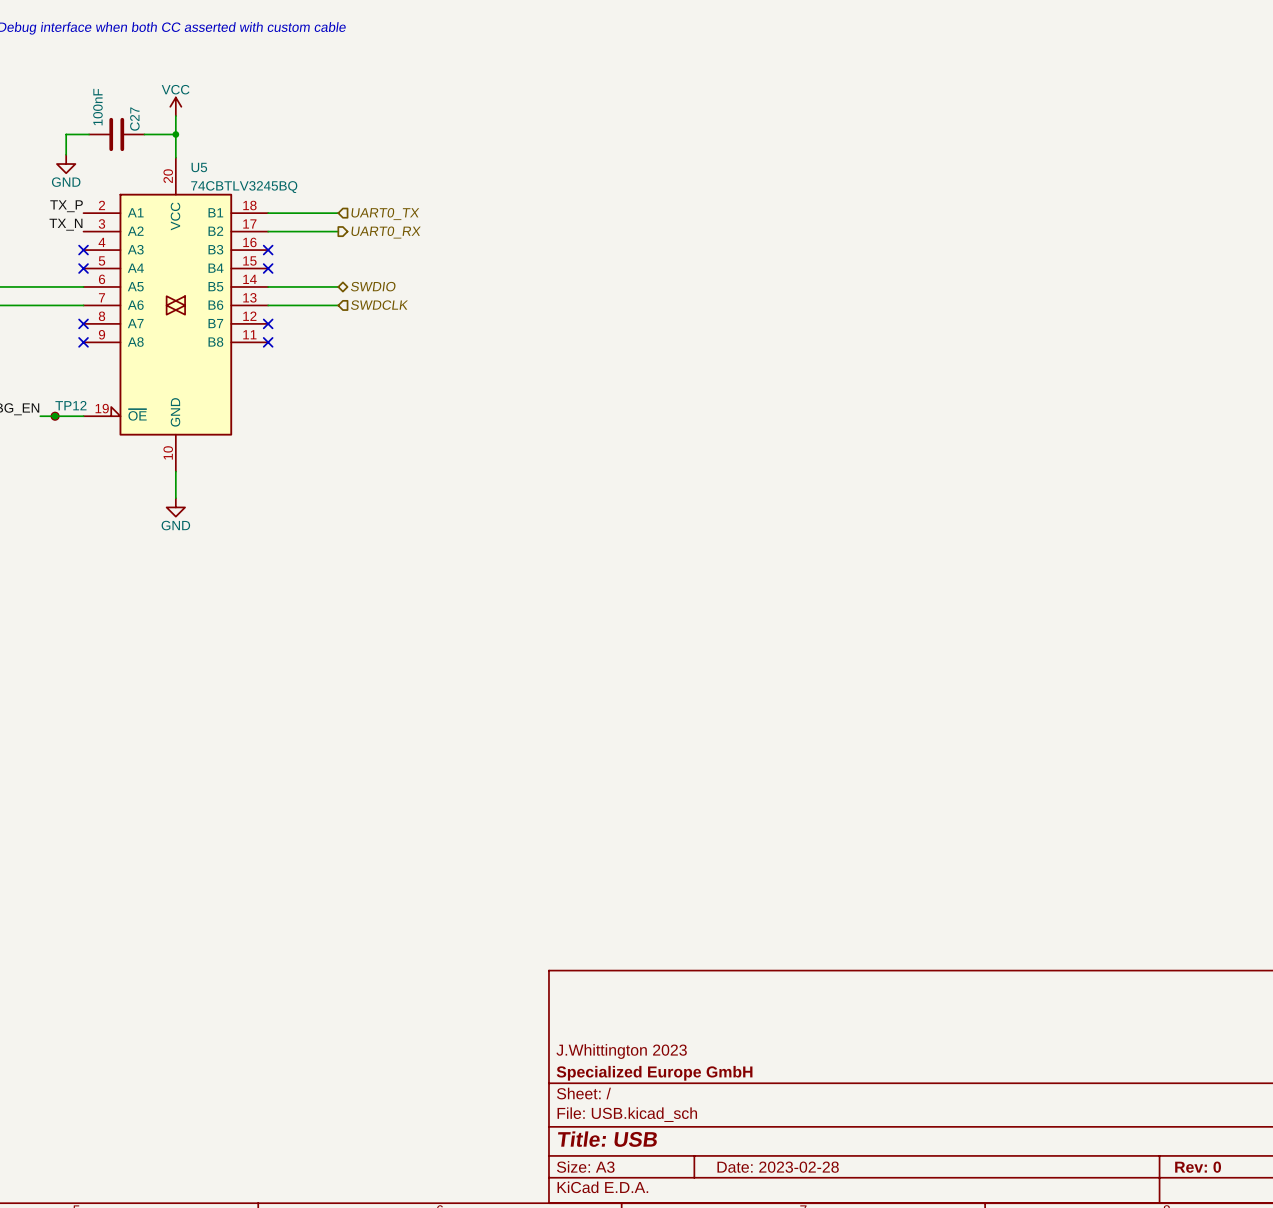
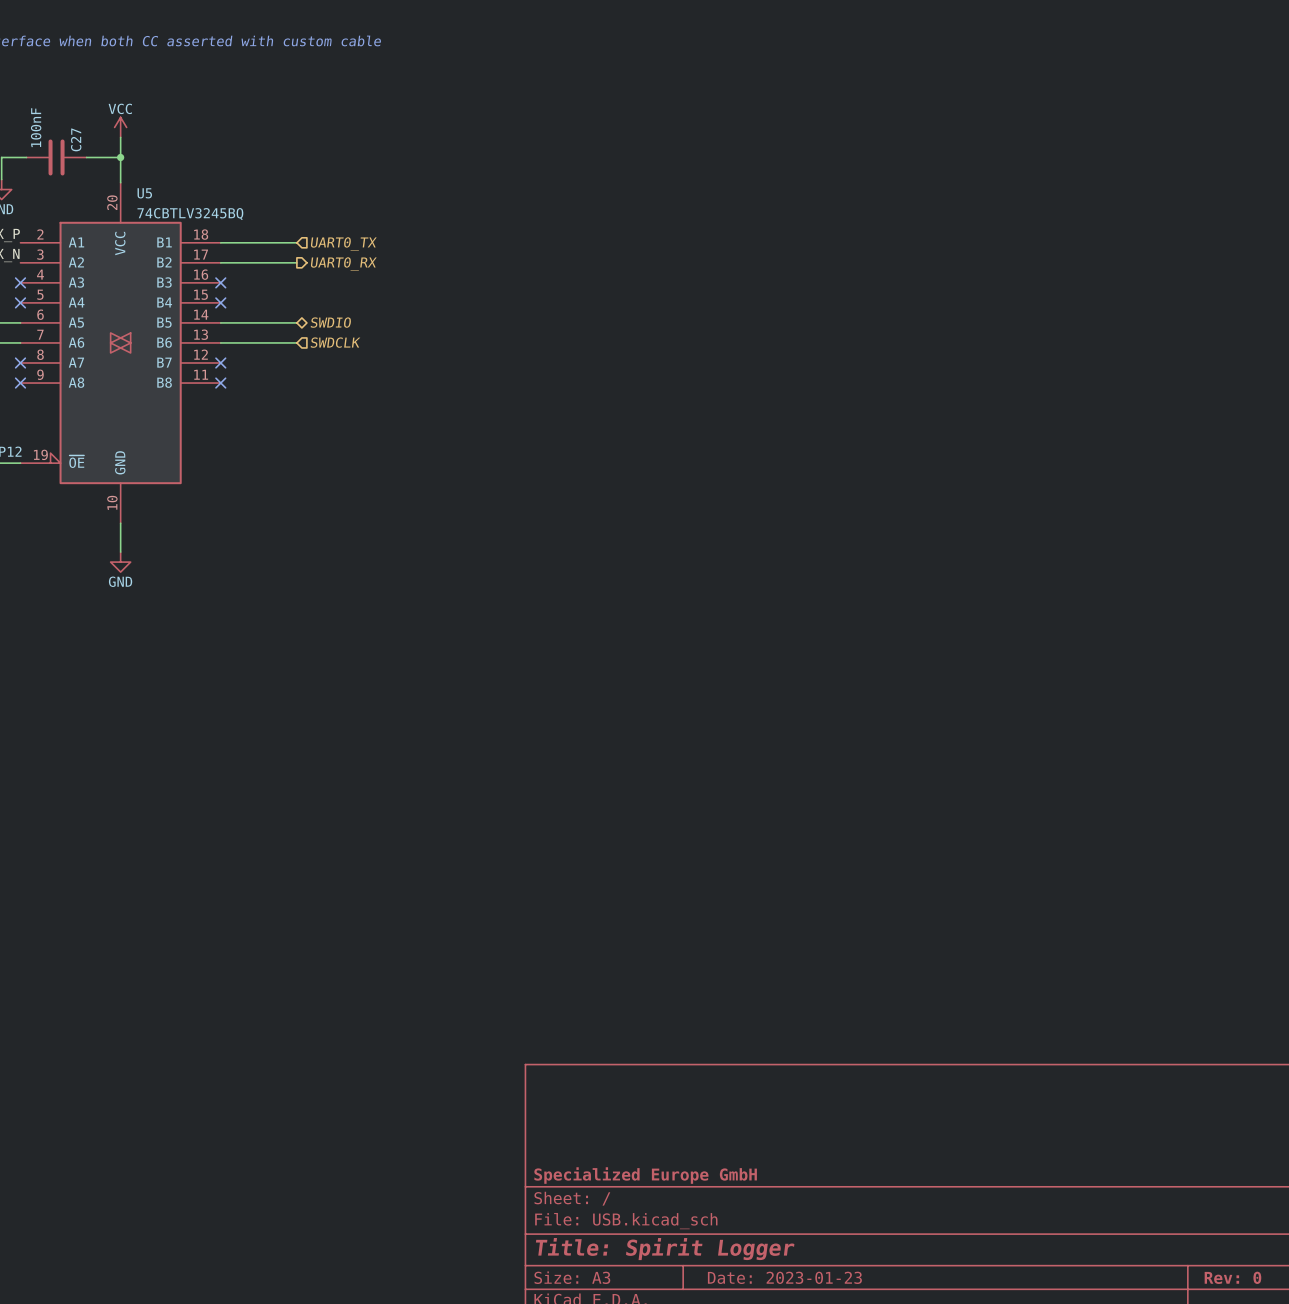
title block: J.Whittington 2023 (621, 1051) -> none
title block: Title: USB (607, 1139) -> Title: Spirit Logger (665, 1249)
title block: Date: 2023-02-28 (778, 1167) -> Date: 2023-01-23 (784, 1277)

